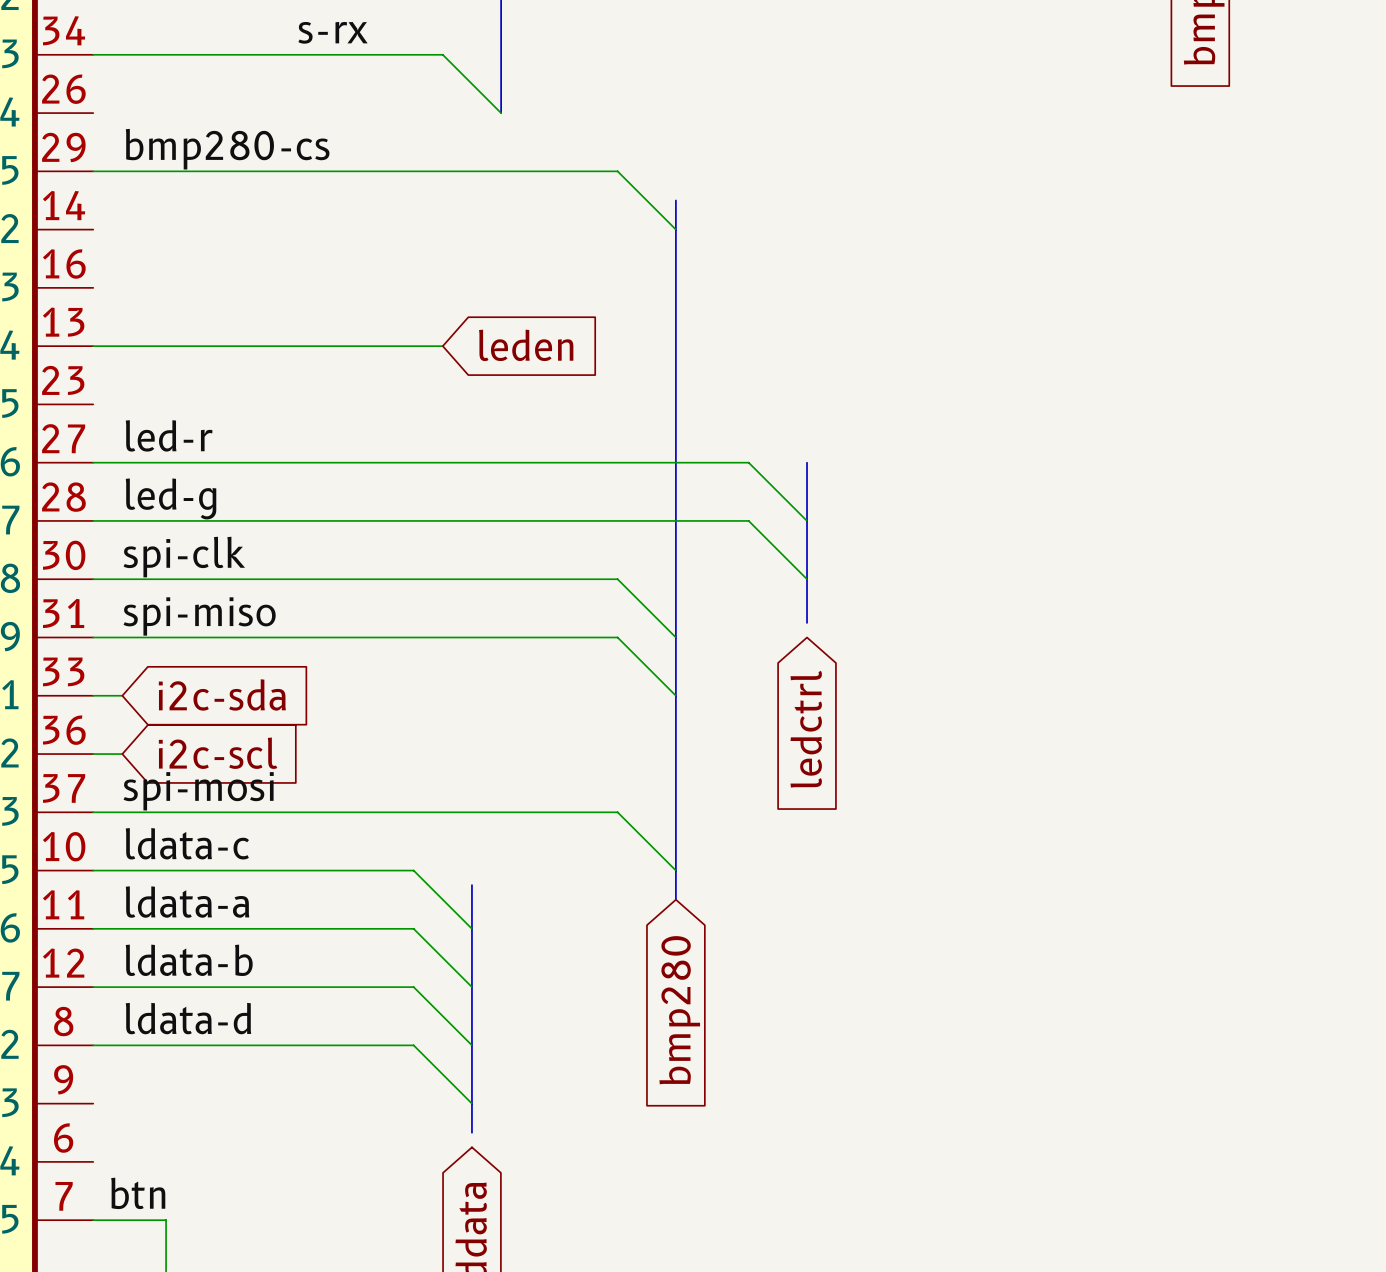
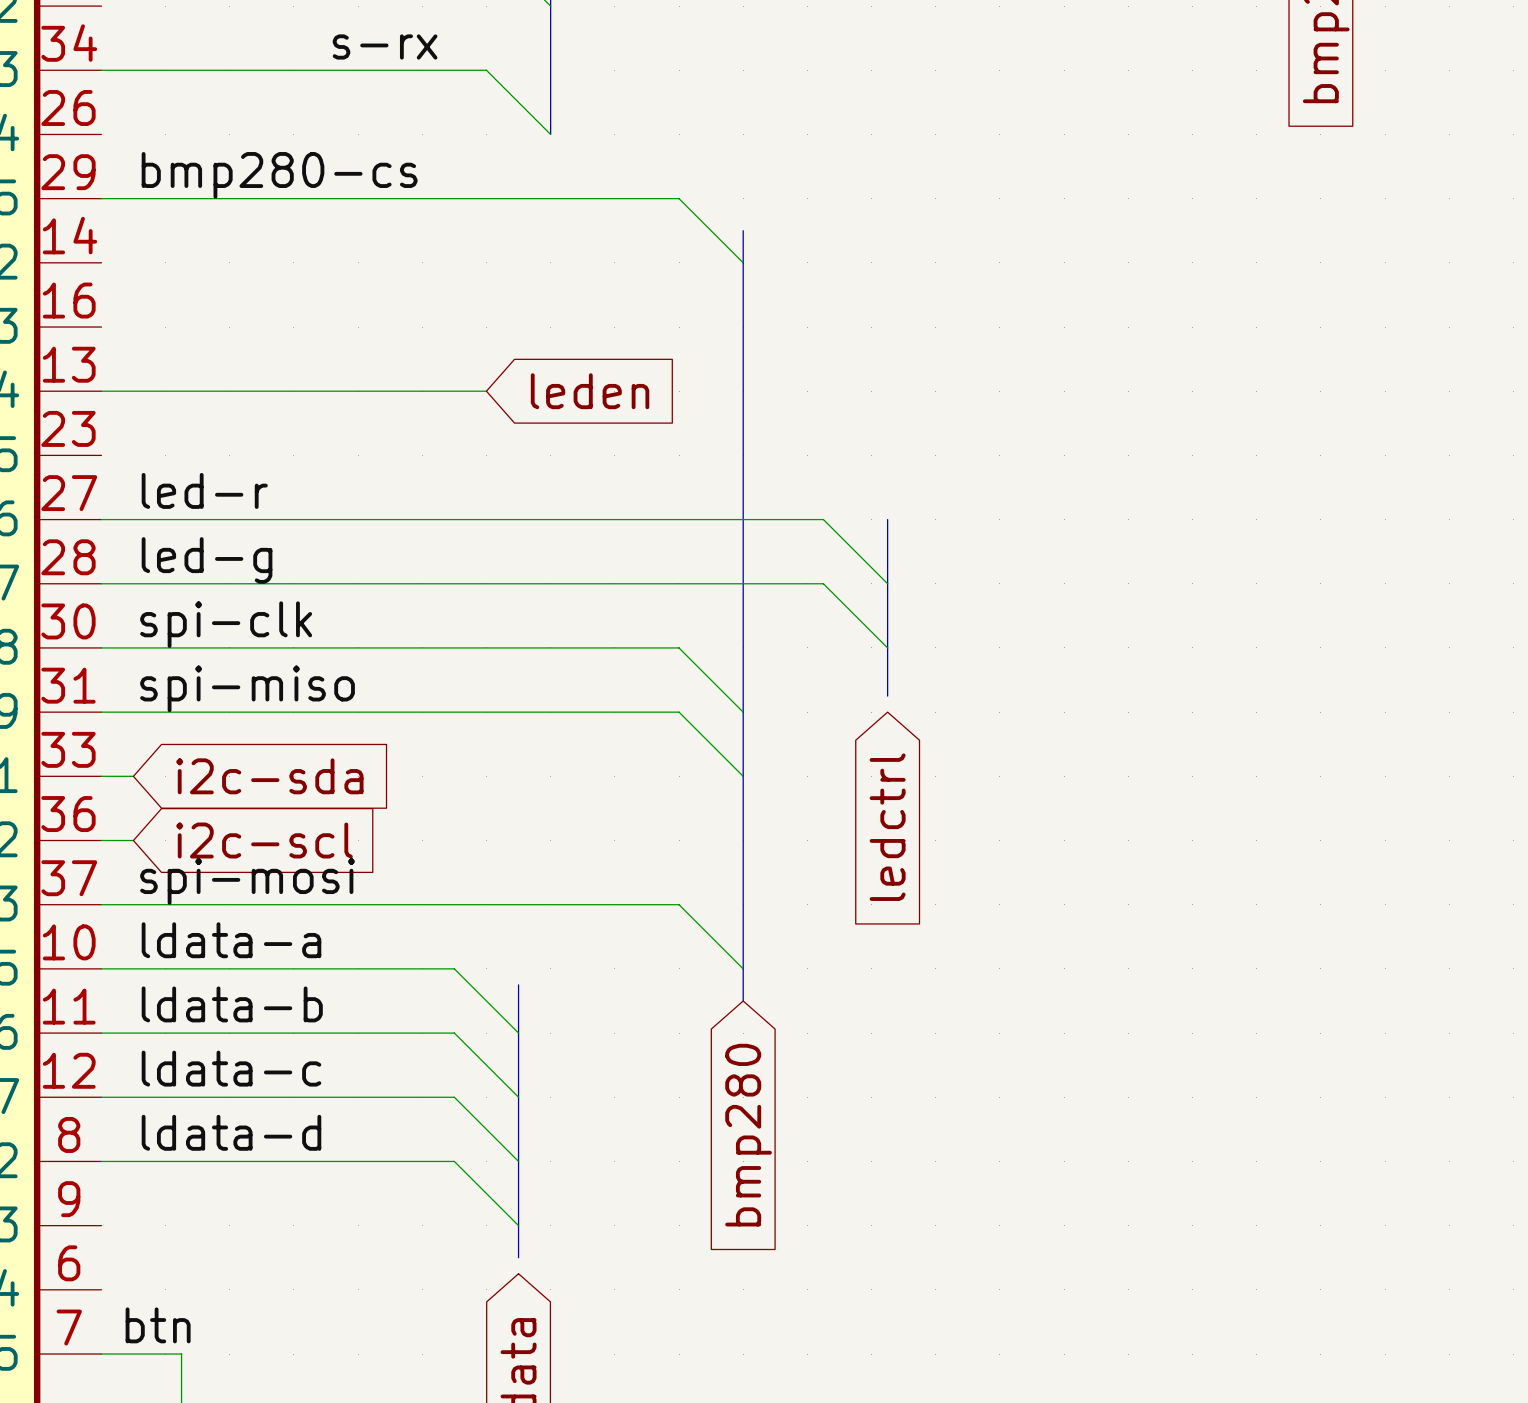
label: ldata-c (187, 843) -> ldata-a (231, 940)
label: ldata-a (187, 902) -> ldata-b (232, 1004)
label: ldata-b (189, 960) -> ldata-c (231, 1068)

